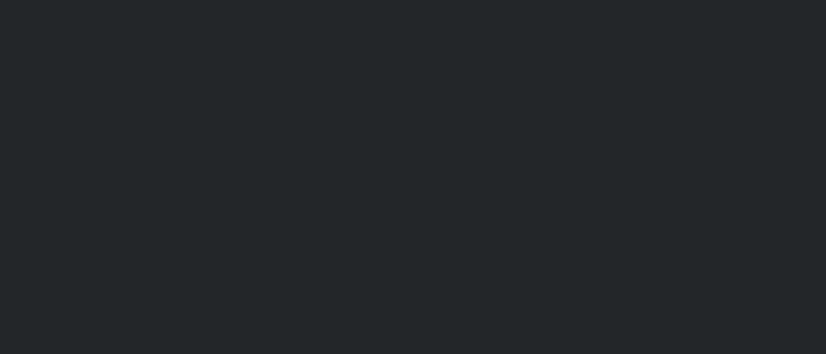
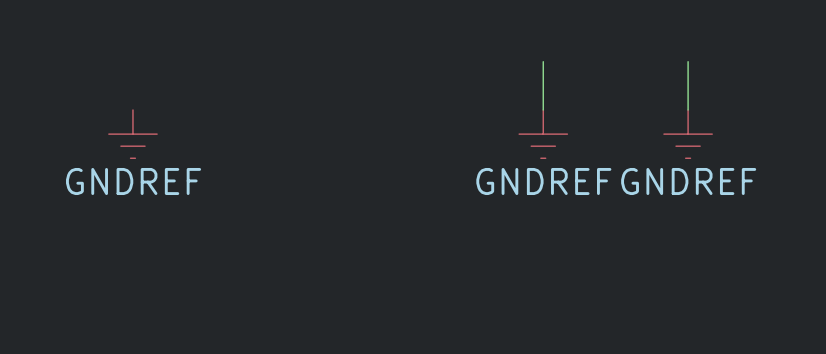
wire: none -> (543, 61) (543, 109)
wire: none -> (688, 61) (688, 109)
power symbol: none -> GNDREF (132, 134)
power symbol: none -> GNDREF (543, 134)
power symbol: none -> GNDREF (688, 134)

